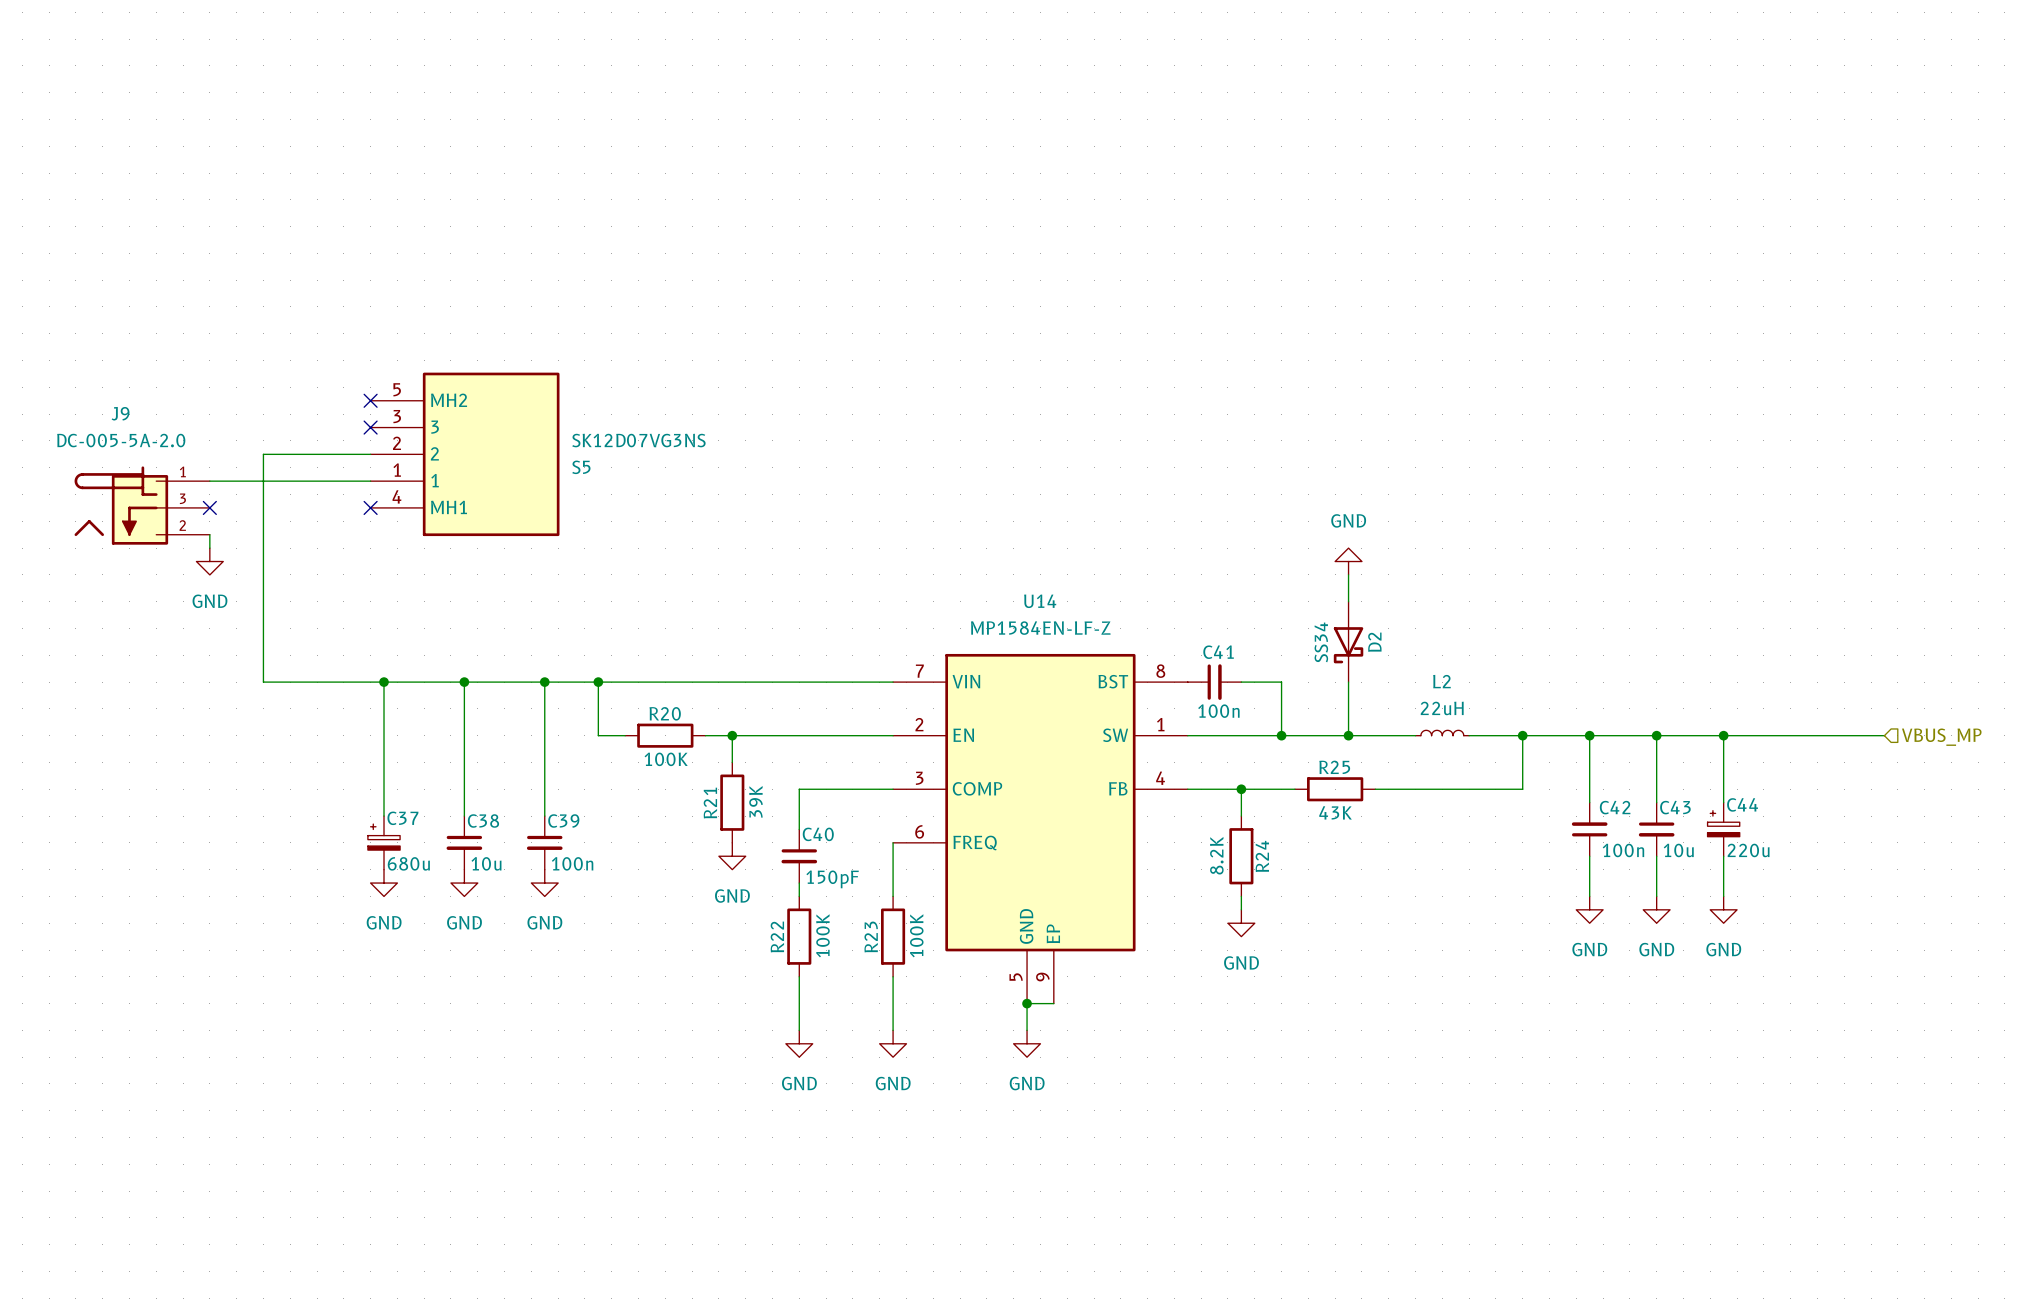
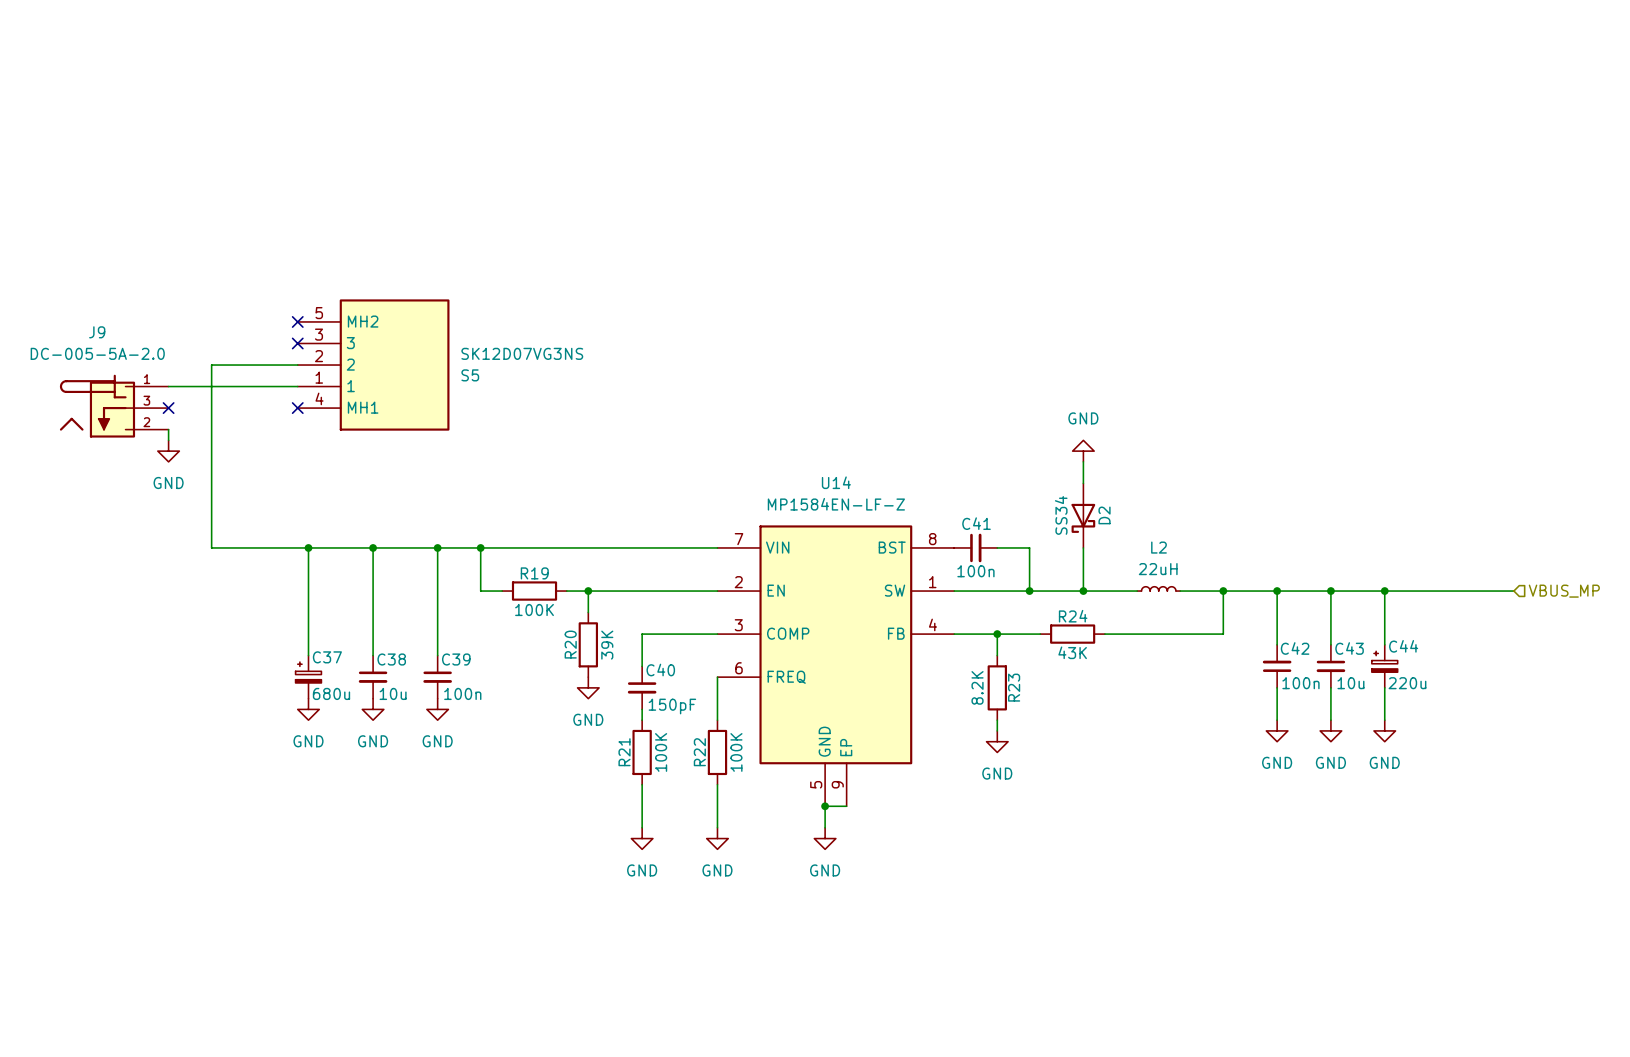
R20 name: R20 (665, 713) -> R19 (534, 573)
R25 name: R25 (1334, 767) -> R24 (1073, 616)
R21 name: R21 (710, 803) -> R20 (570, 644)
R24 name: R24 (1262, 856) -> R23 (1014, 687)
R22 name: R22 (777, 937) -> R21 (624, 752)
R23 name: R23 (871, 937) -> R22 (699, 752)

